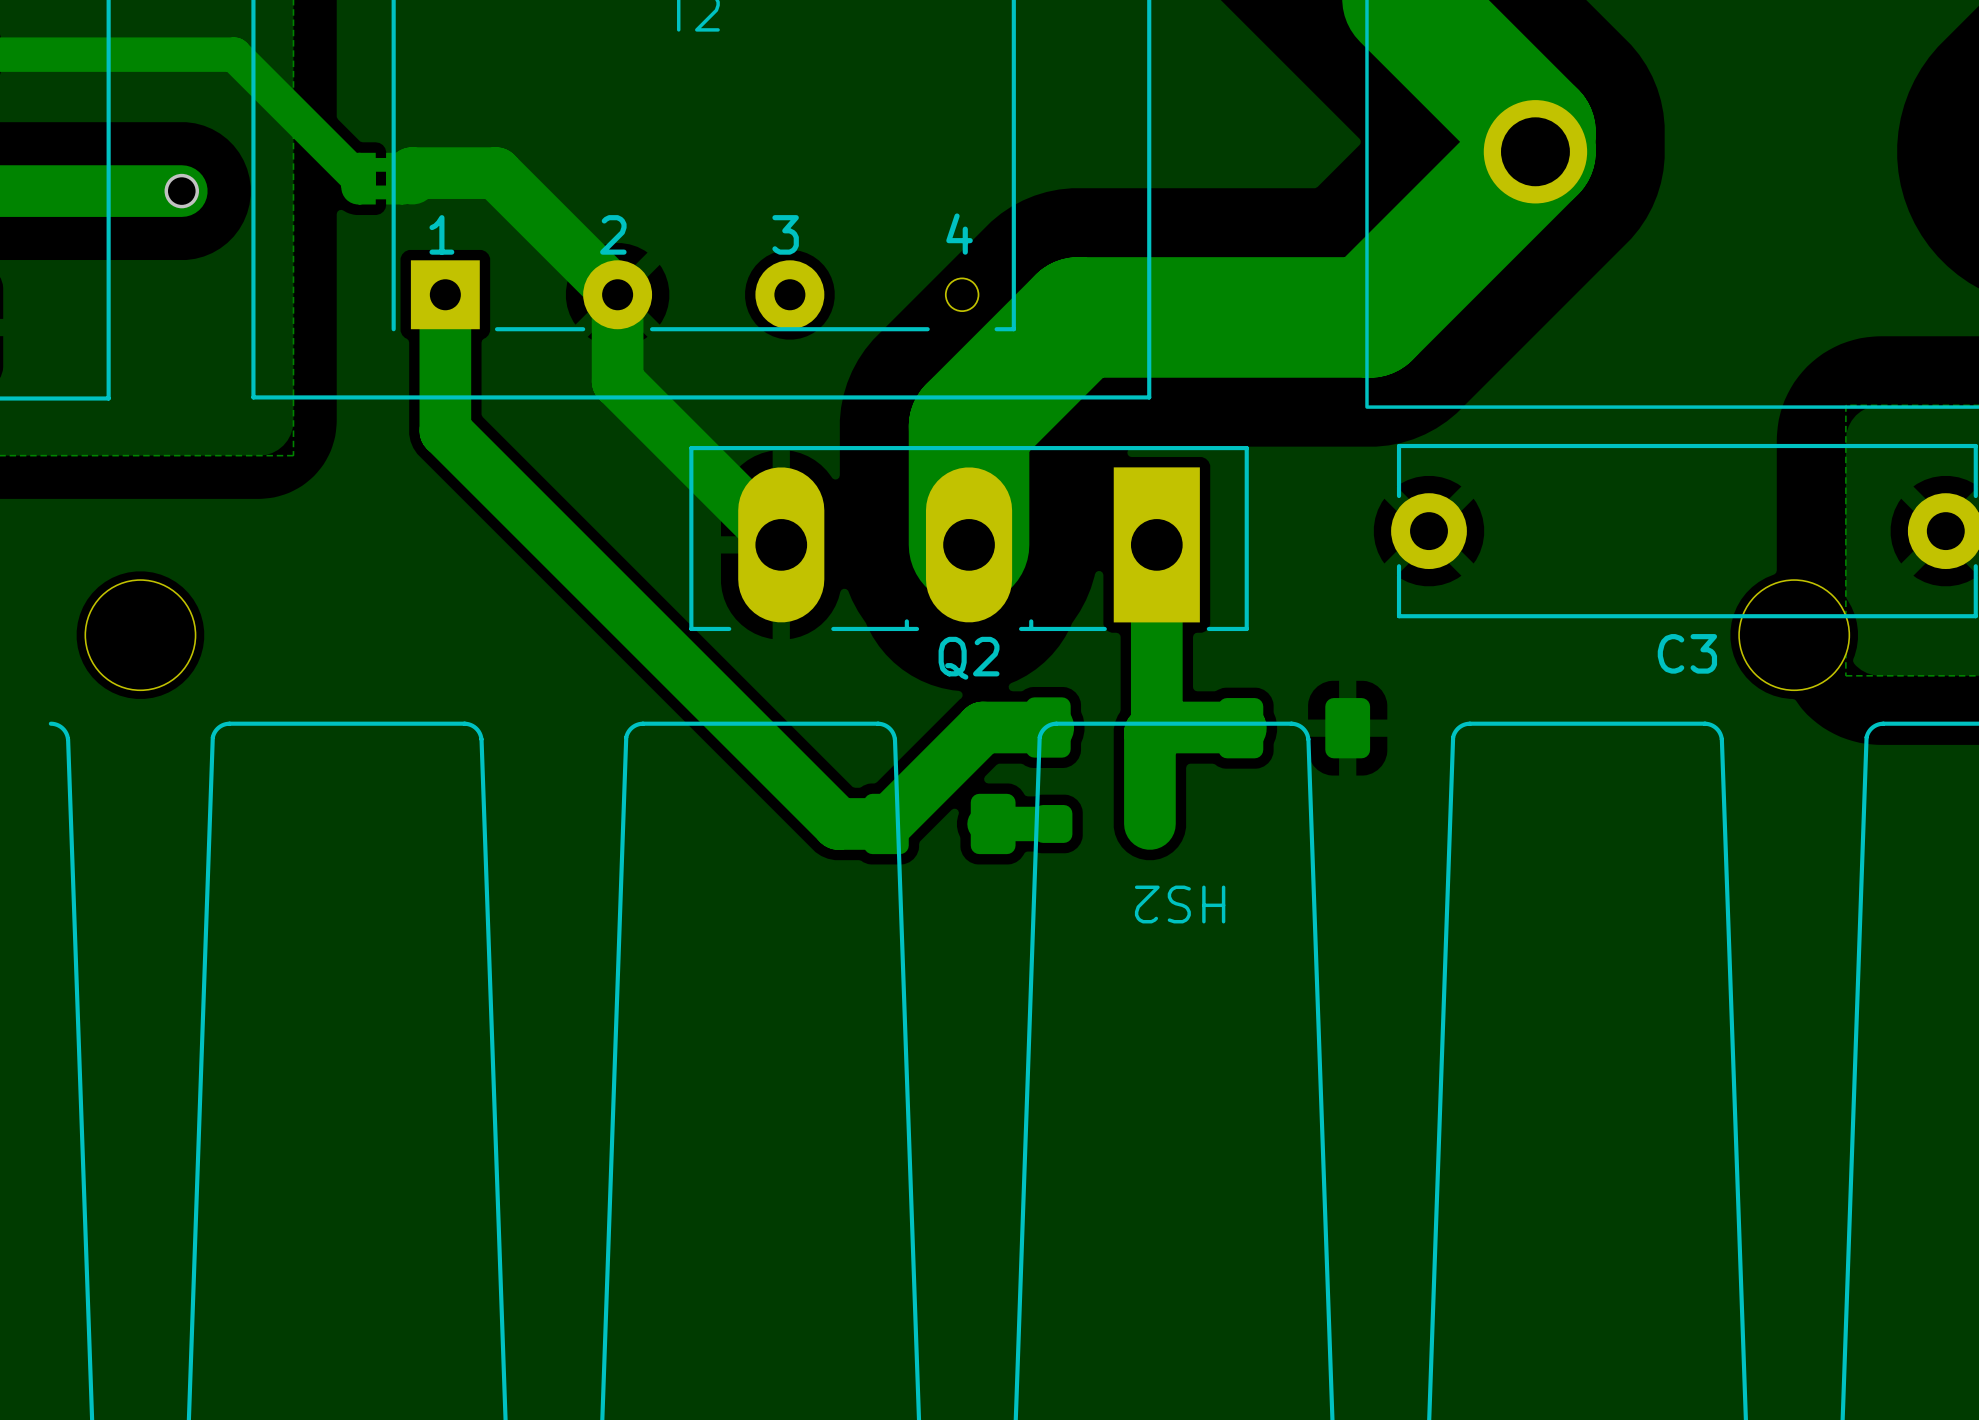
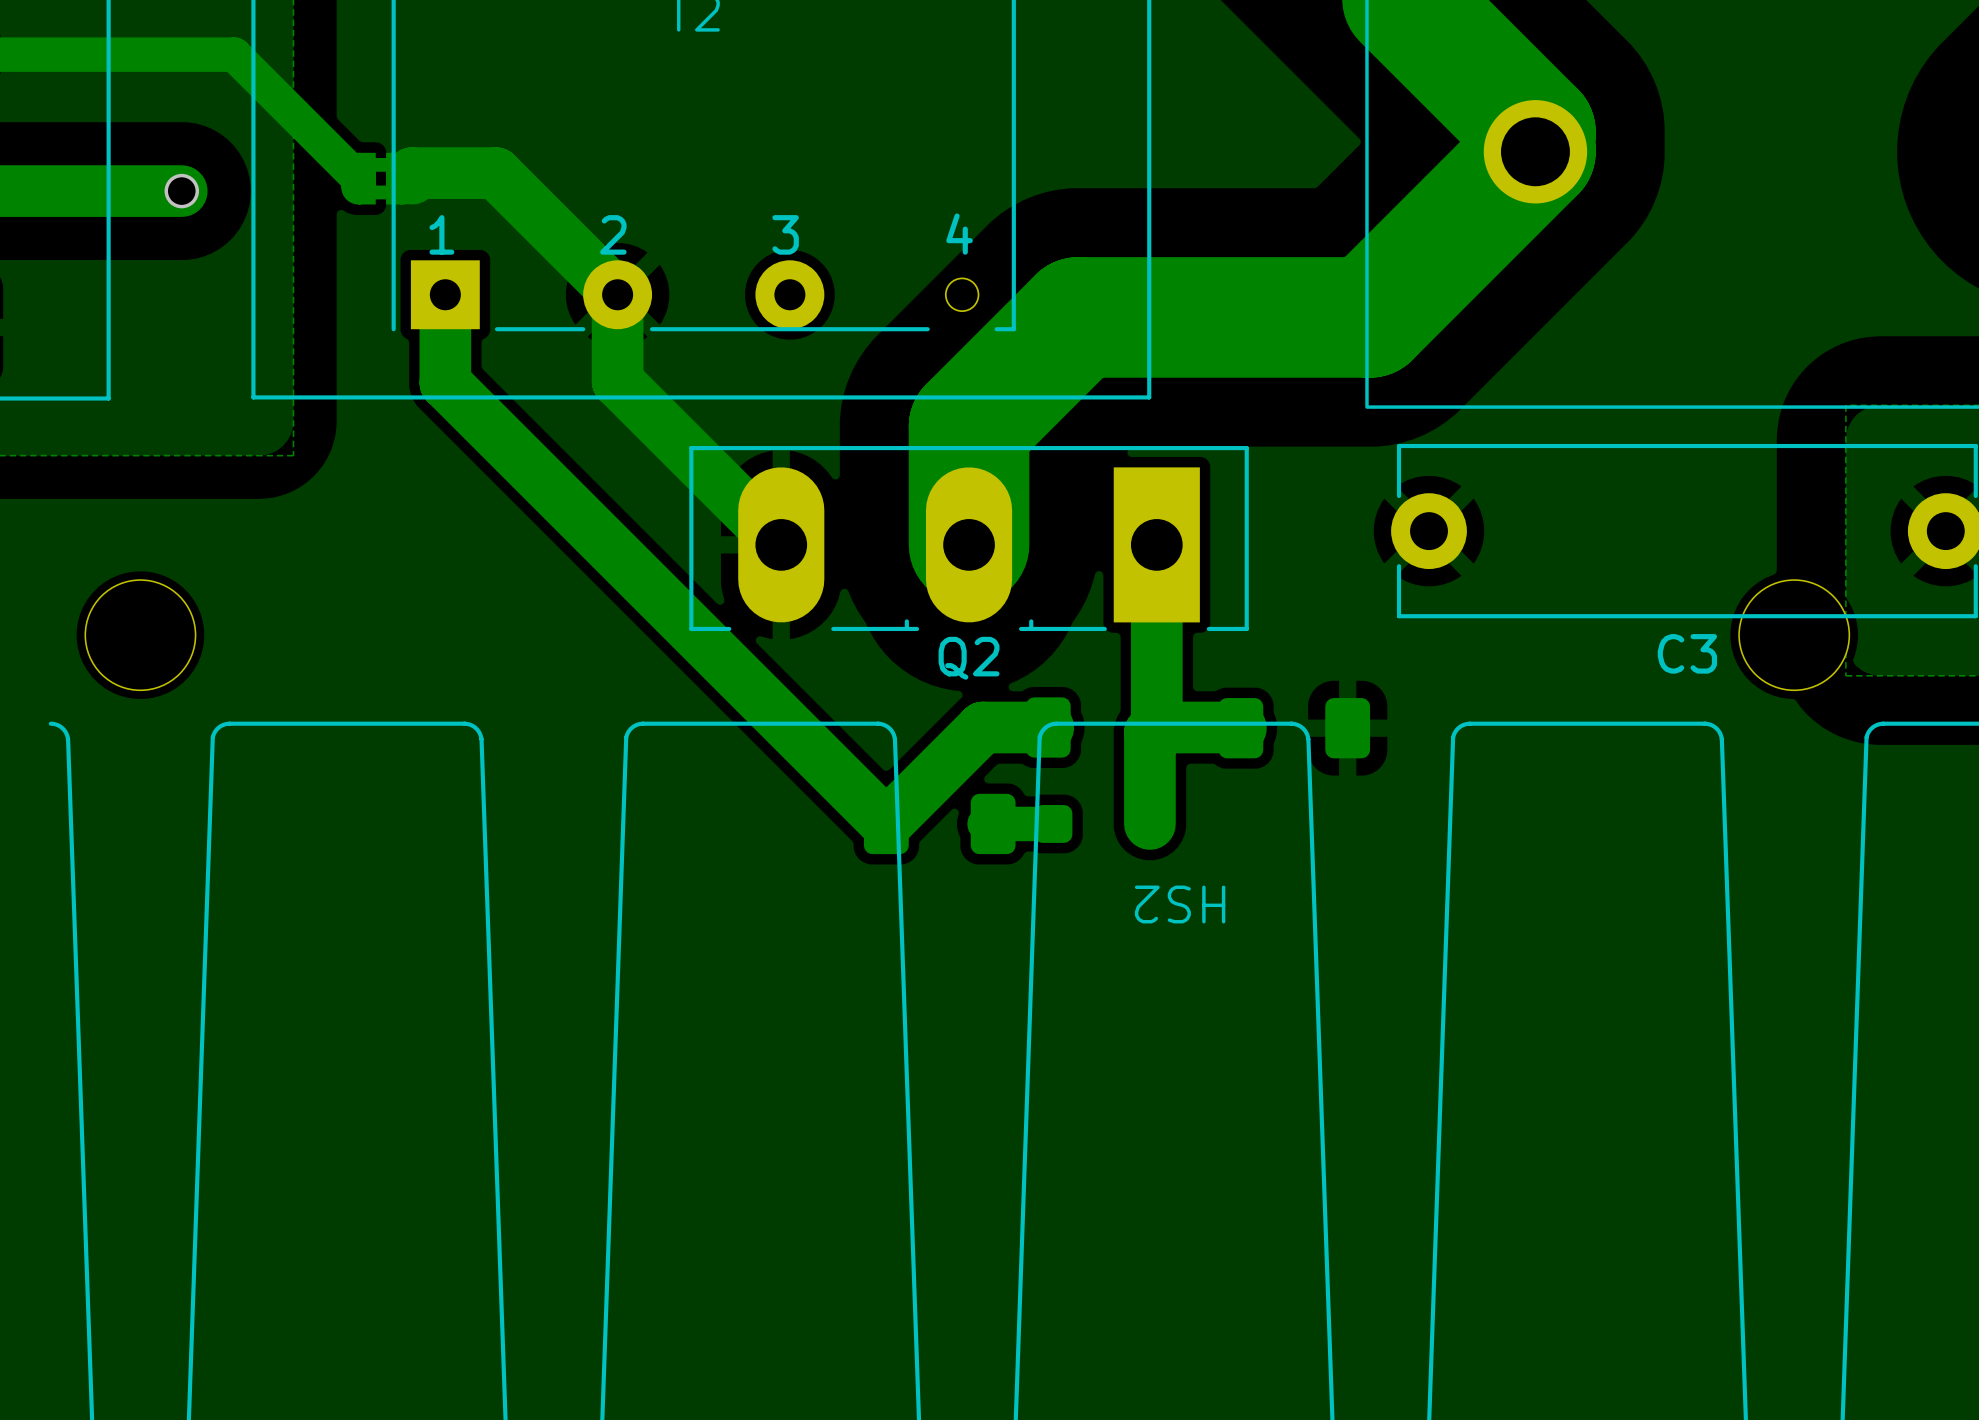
bottom track: (445, 382) (445, 430) (838, 823) (886, 823) -> (445, 382) (886, 823)

